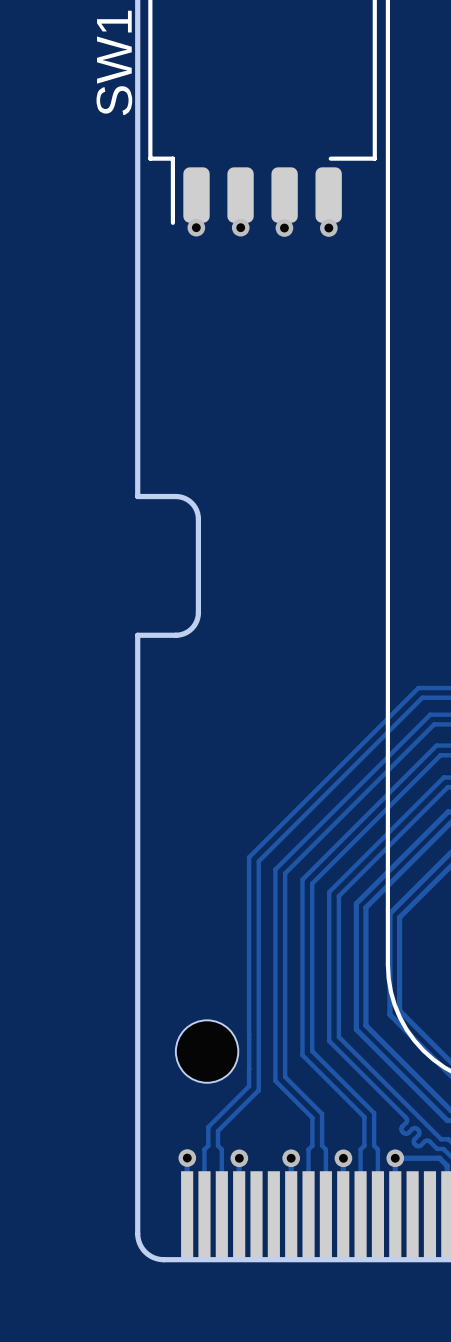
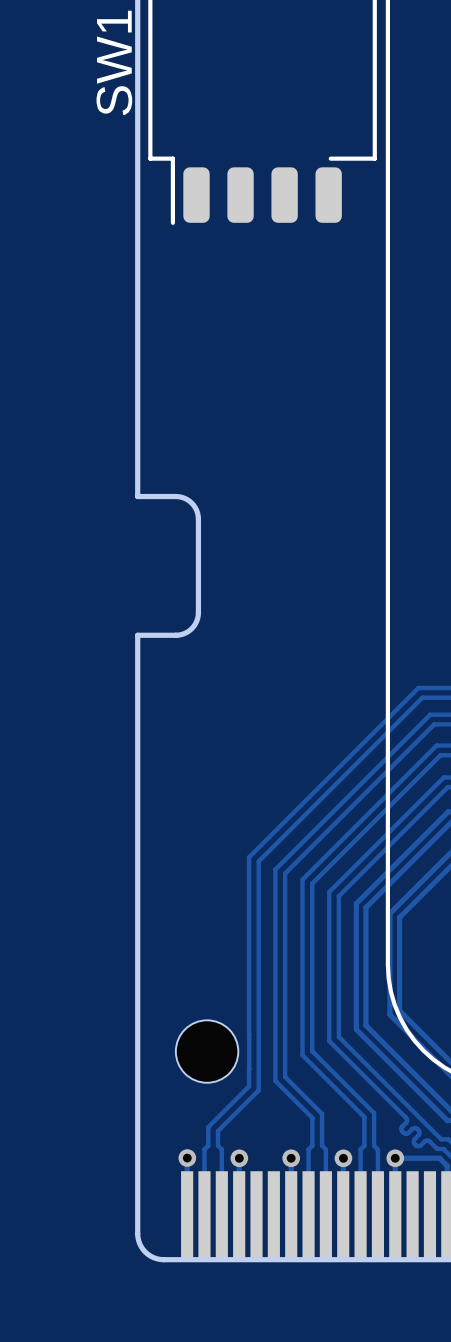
via: (196, 227) -> none
via: (240, 227) -> none
via: (284, 228) -> none
via: (328, 228) -> none

